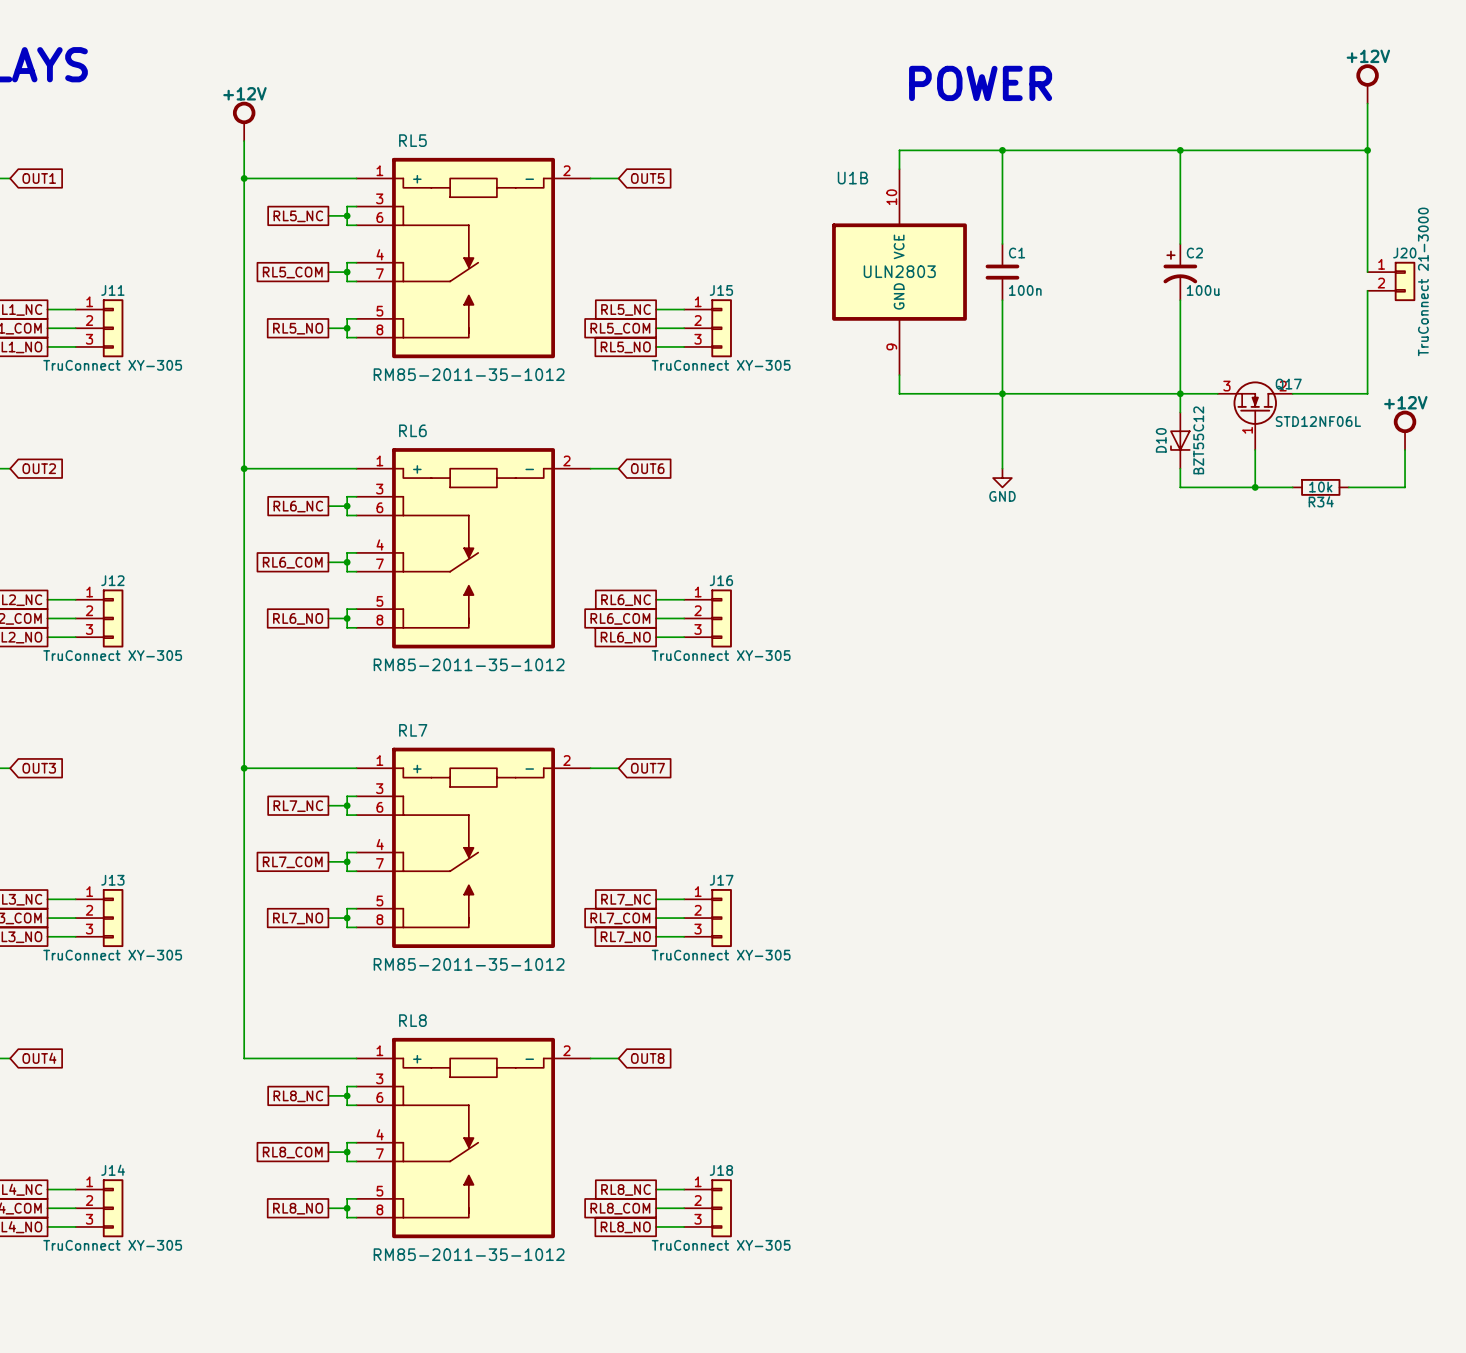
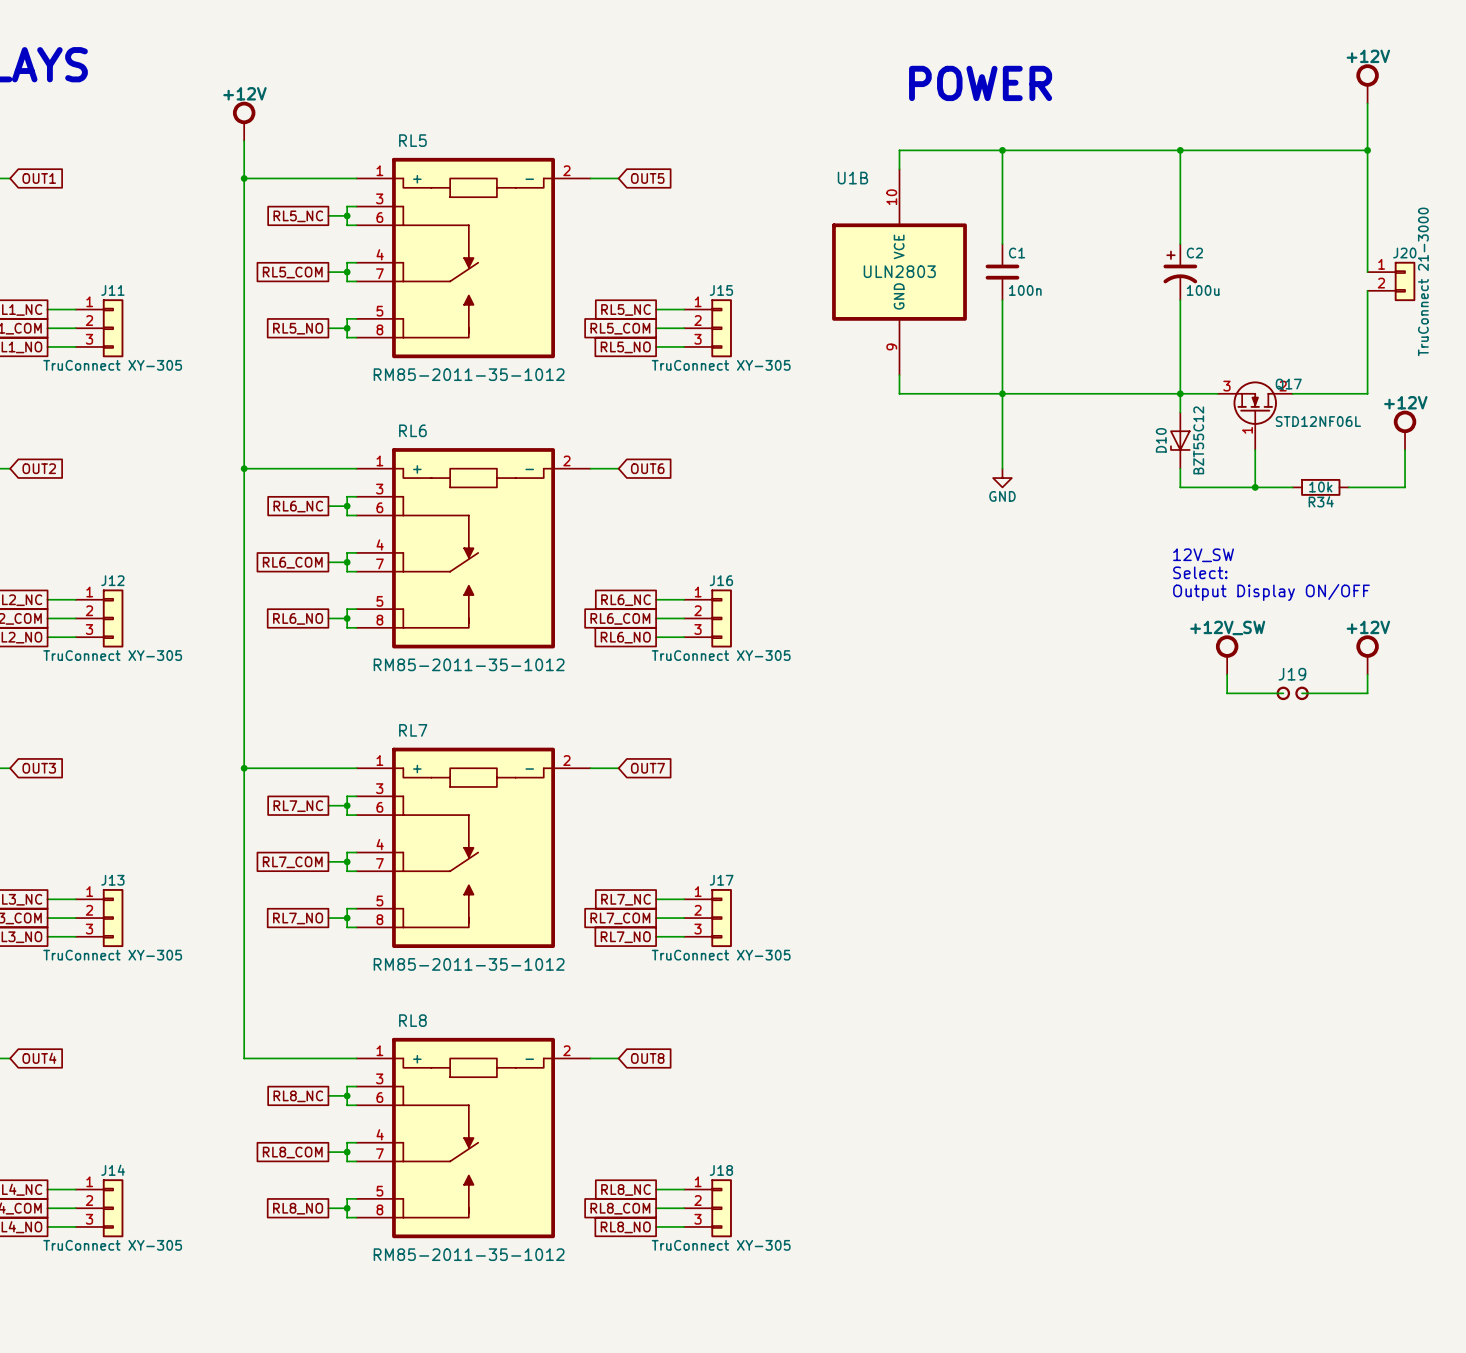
text: none -> 12V_SW (1203, 555)
text: none -> Select: (1200, 572)
text: none -> Output Display ON/OFF (1271, 592)
power symbol: none -> (1227, 655)
power symbol: none -> (1367, 655)
wire: none -> (1227, 674) (1227, 693) (1283, 693)
wire: none -> (1367, 674) (1367, 693) (1302, 693)
J19: none -> (1292, 693)

